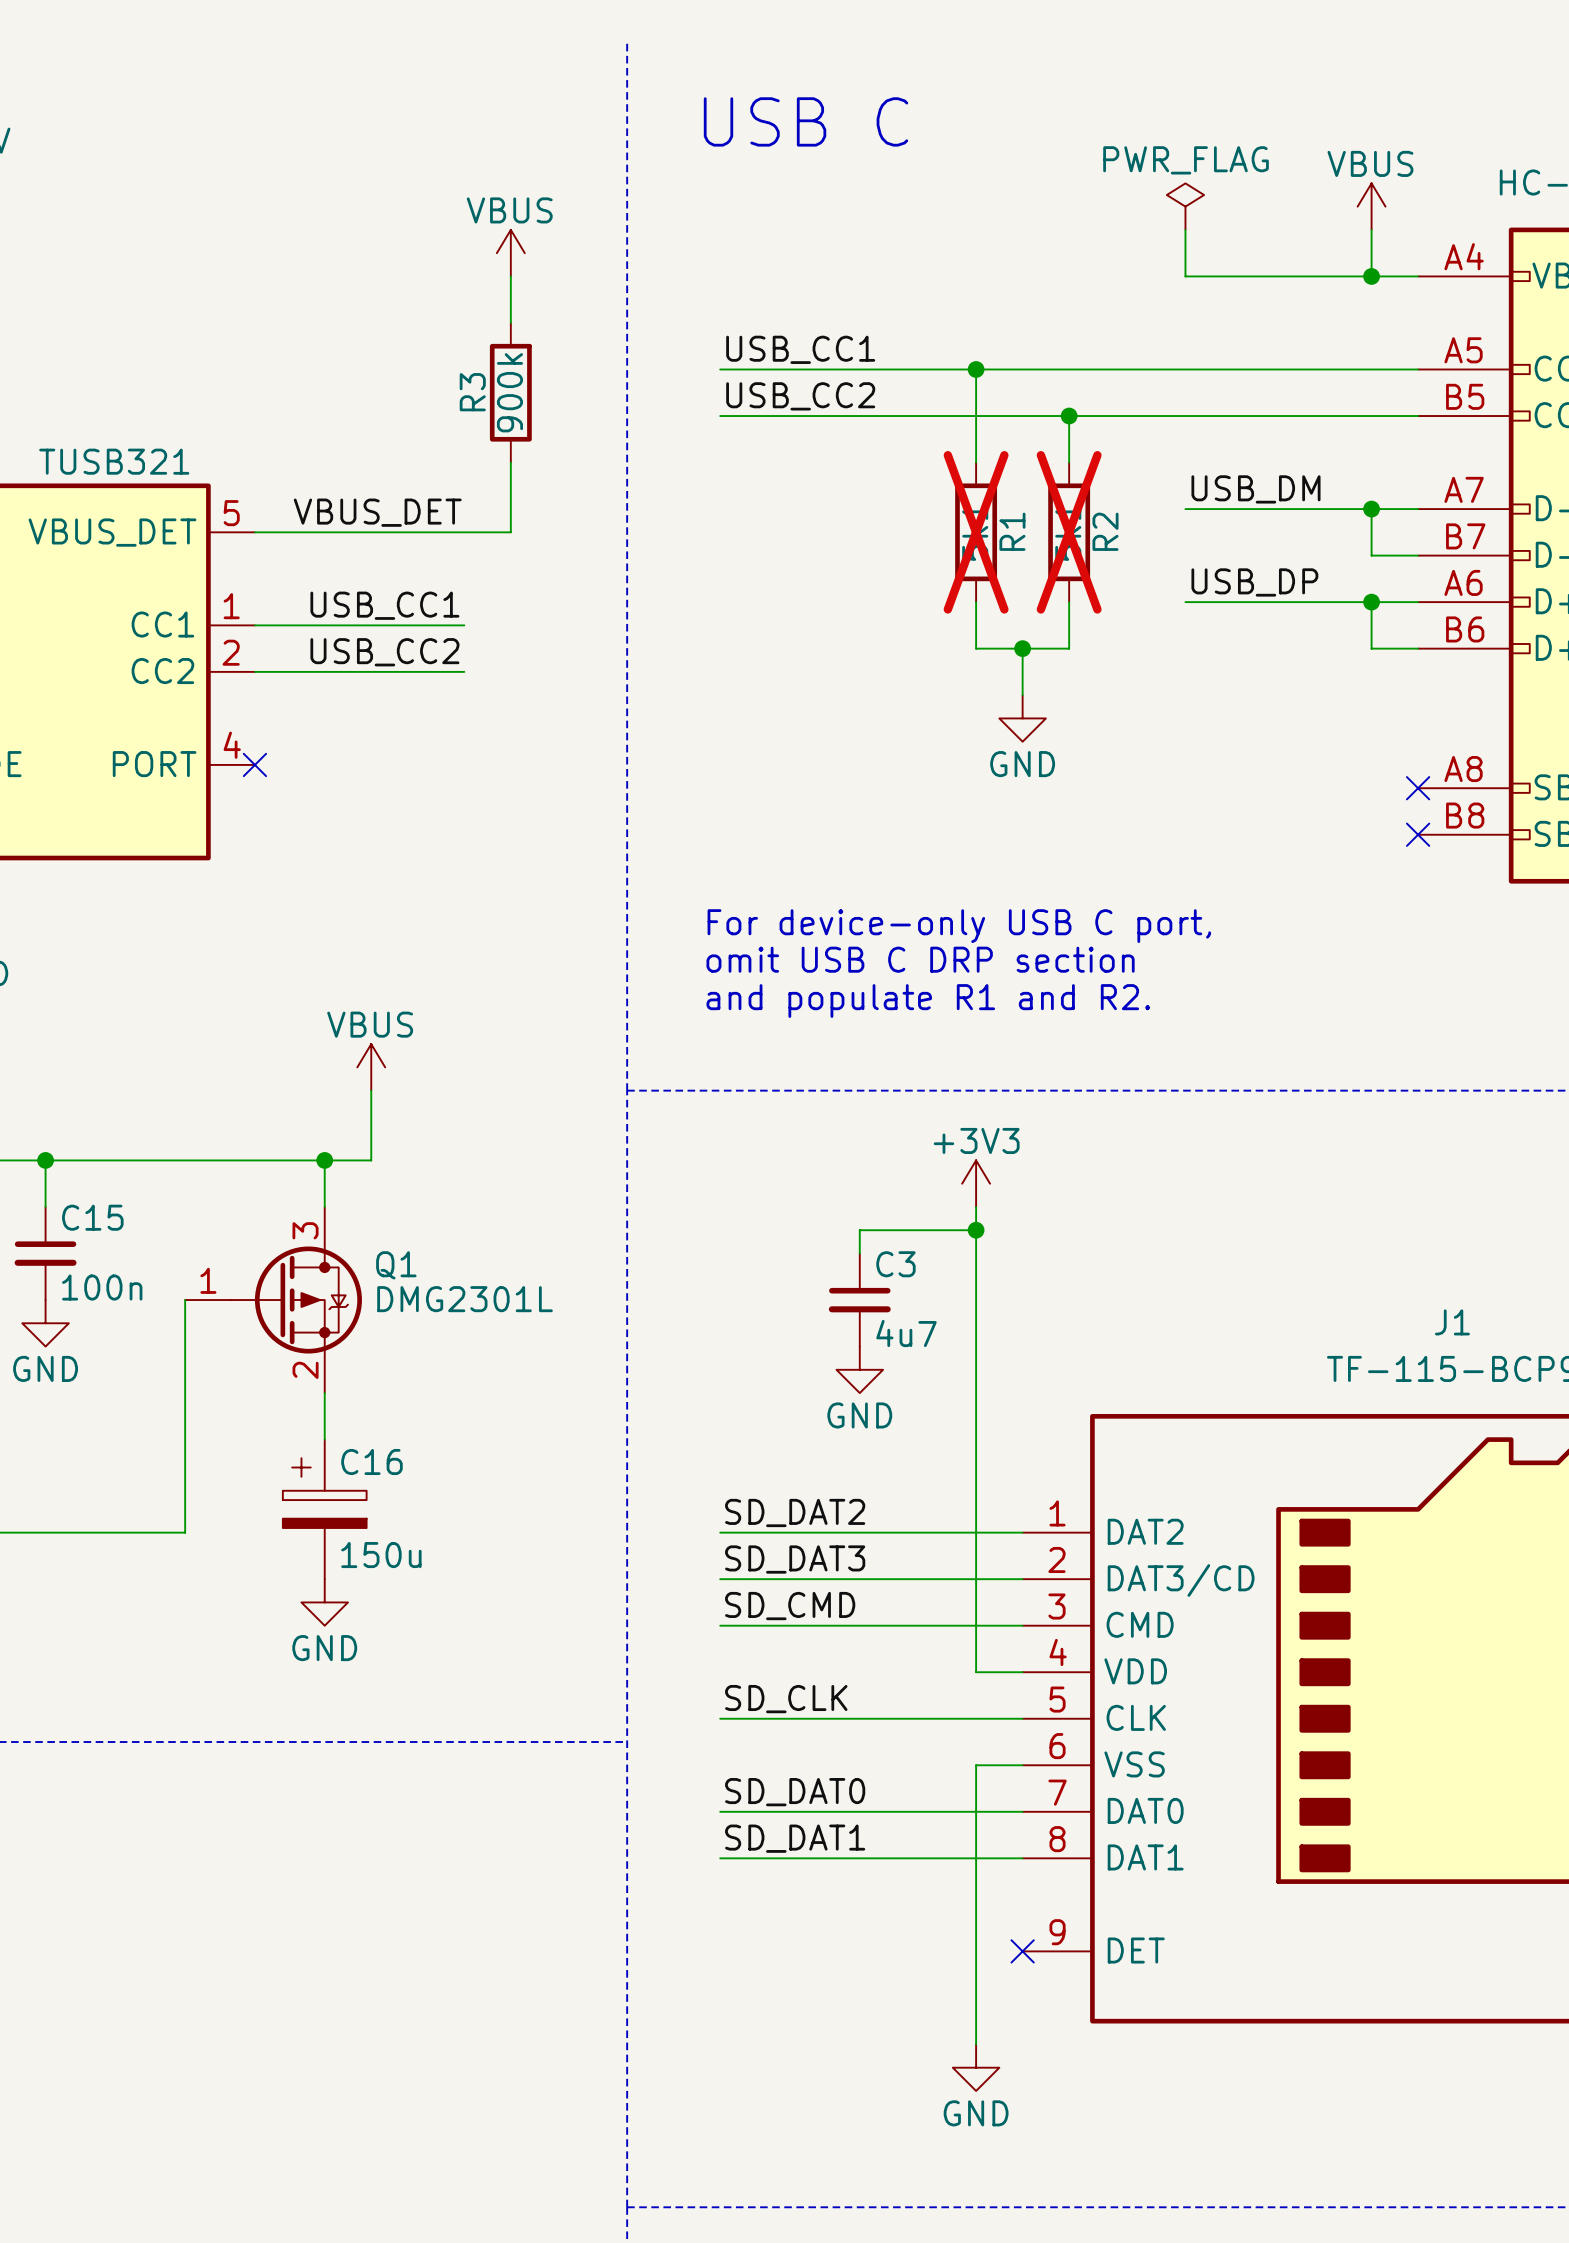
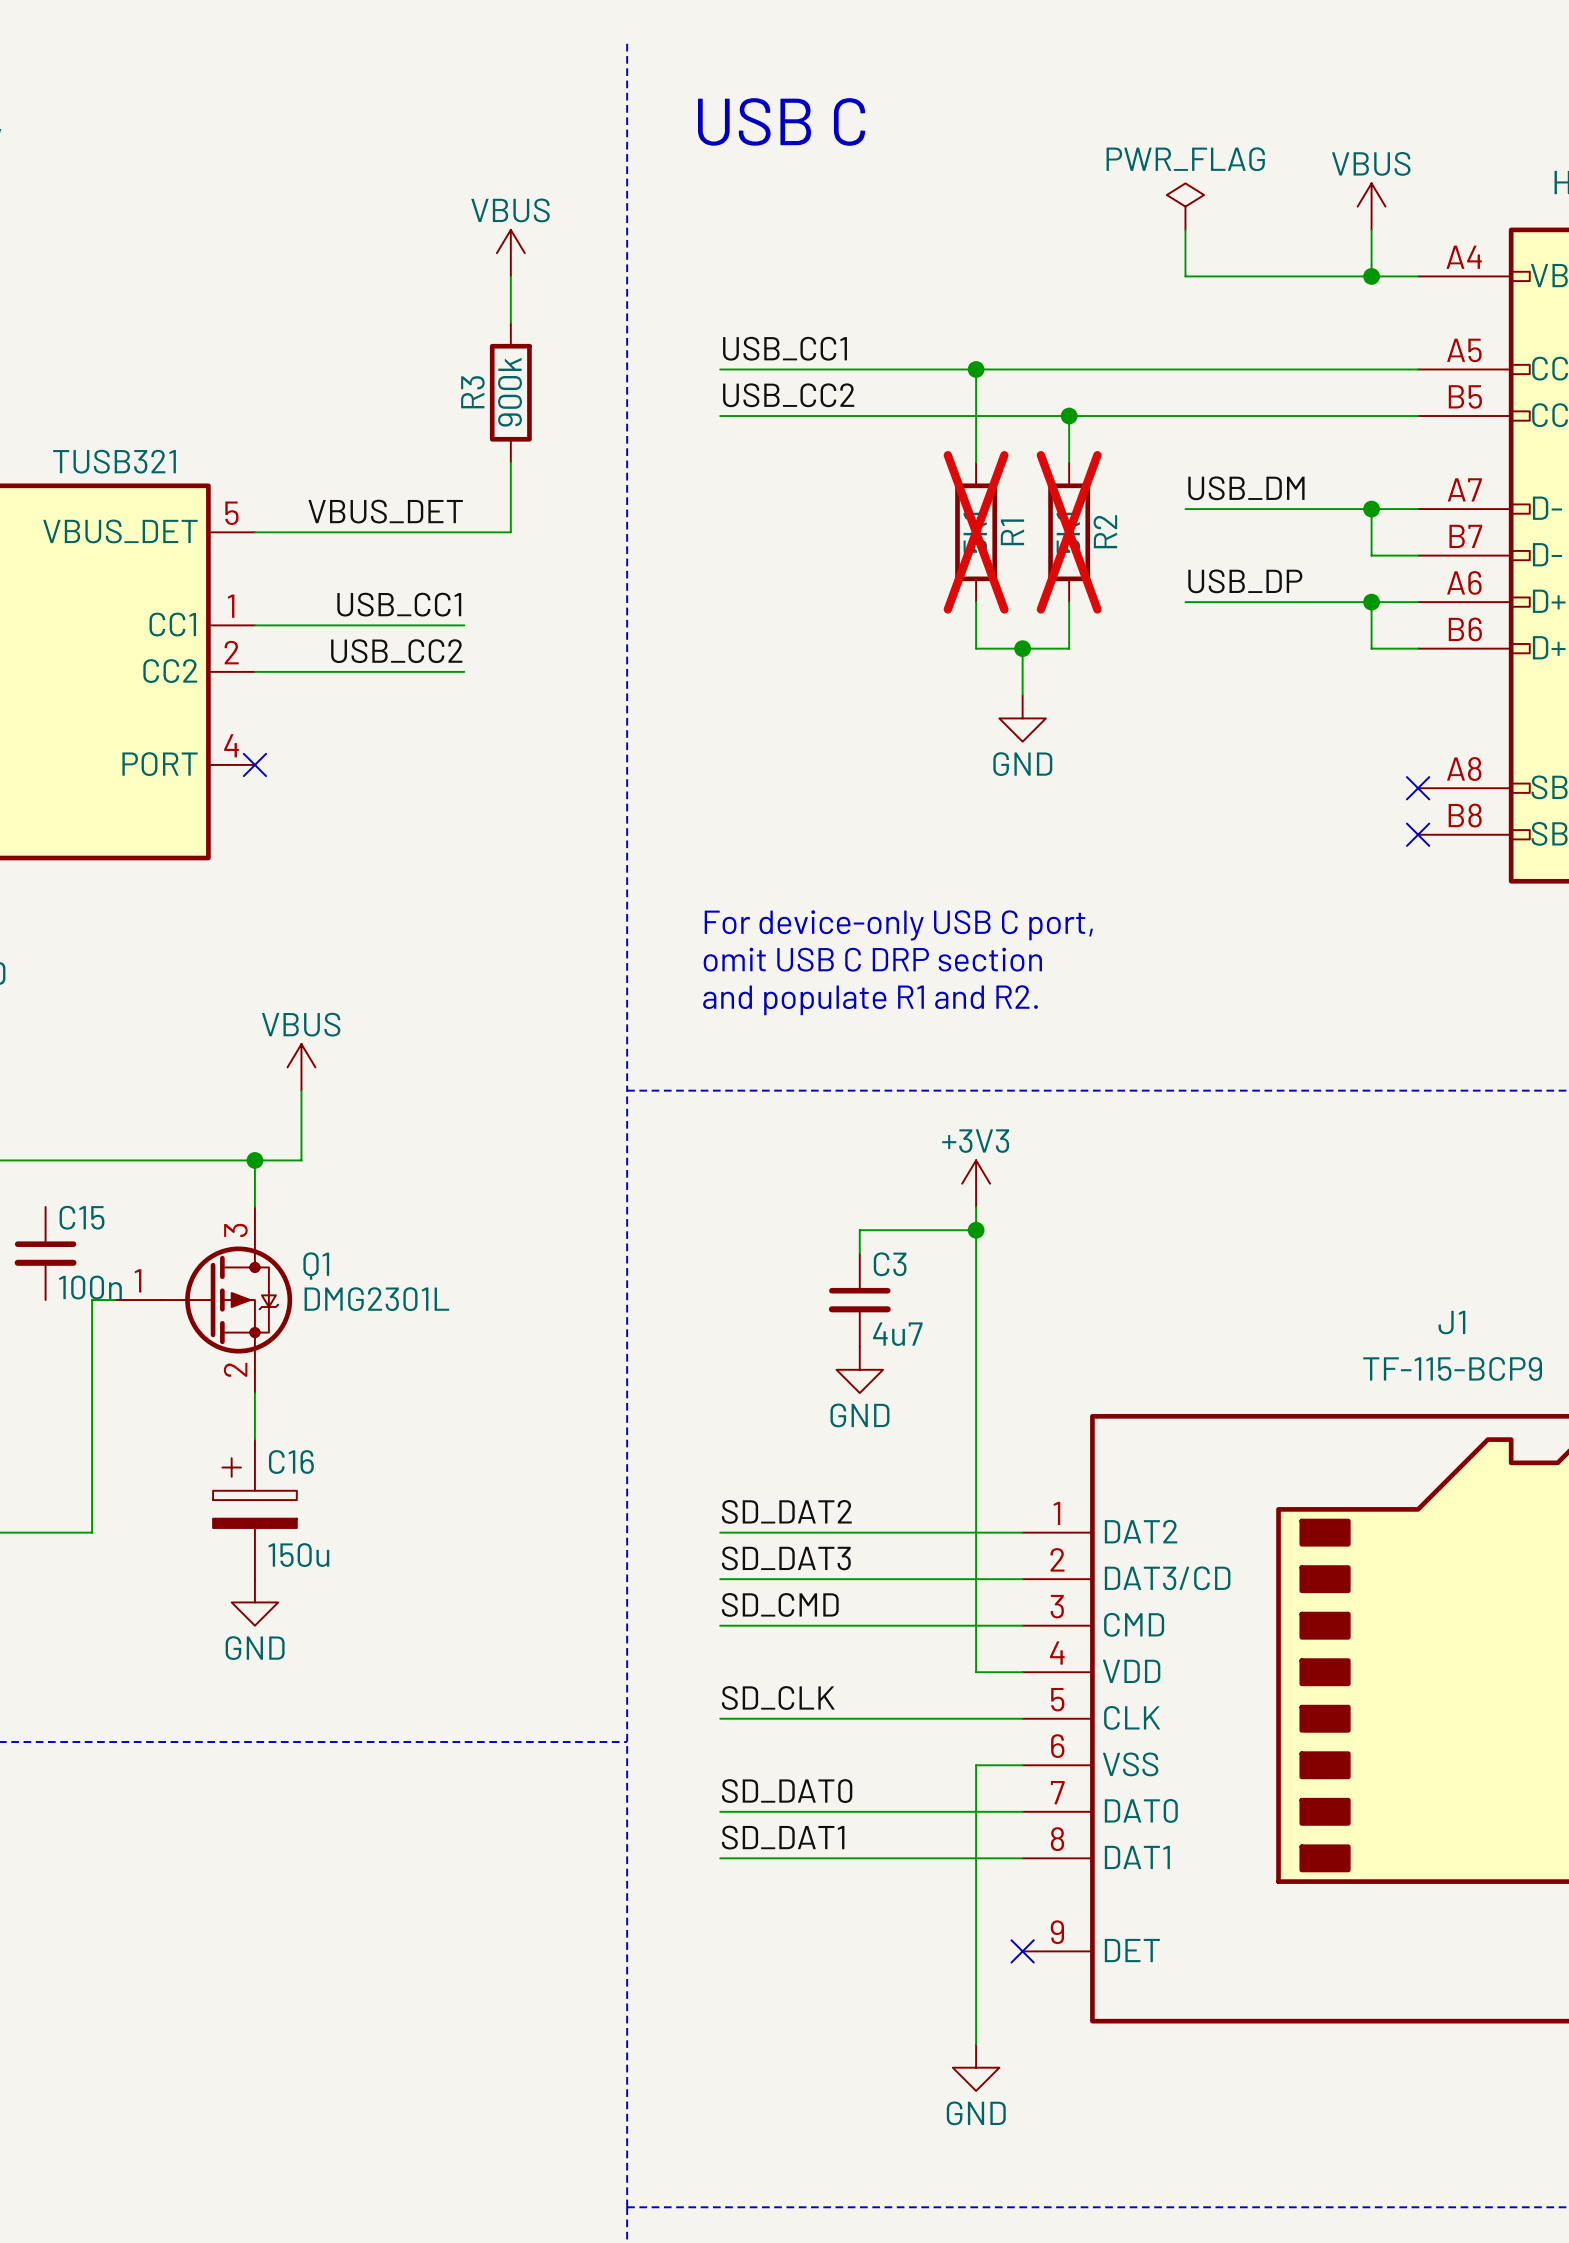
power symbol position: VBUS (371, 1067) -> VBUS (301, 1067)
wire: (371, 1090) (371, 1160) (301, 1160) -> (301, 1090) (301, 1160)
wire: (45, 1160) (45, 1206) -> none
junction: (45, 1160) -> none
wire: (324, 1160) (324, 1206) -> (254, 1160) (254, 1206)
junction position: (324, 1160) -> (254, 1160)
wire: (185, 1300) (185, 1532) (92, 1532) -> (115, 1300) (92, 1300) (92, 1532)
Q1 position: (273, 1300) -> (203, 1300)
power symbol: GND (45, 1323) -> none
wire: (324, 1393) (324, 1439) -> (254, 1393) (254, 1439)
C16 position: (324, 1509) -> (254, 1509)
power symbol position: GND (324, 1602) -> GND (254, 1602)

